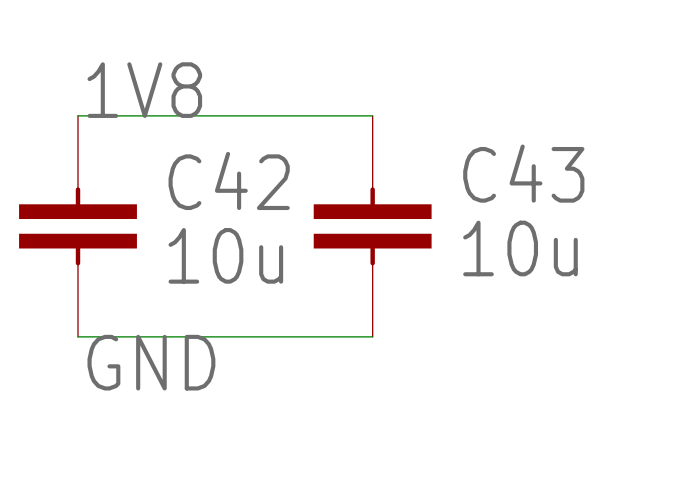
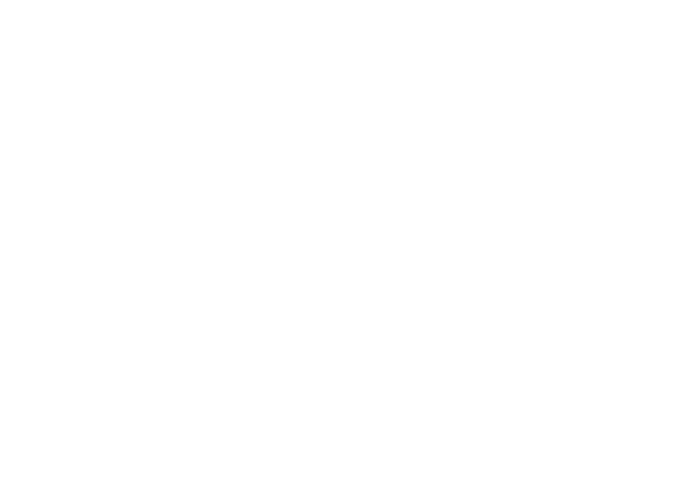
label: 1V8 (144, 90) -> none
wire: (78, 115) (372, 115) -> none
C42: 10u (78, 226) -> none
C43: 10u (372, 226) -> none
wire: (78, 336) (372, 336) -> none
label: GND (151, 362) -> none

